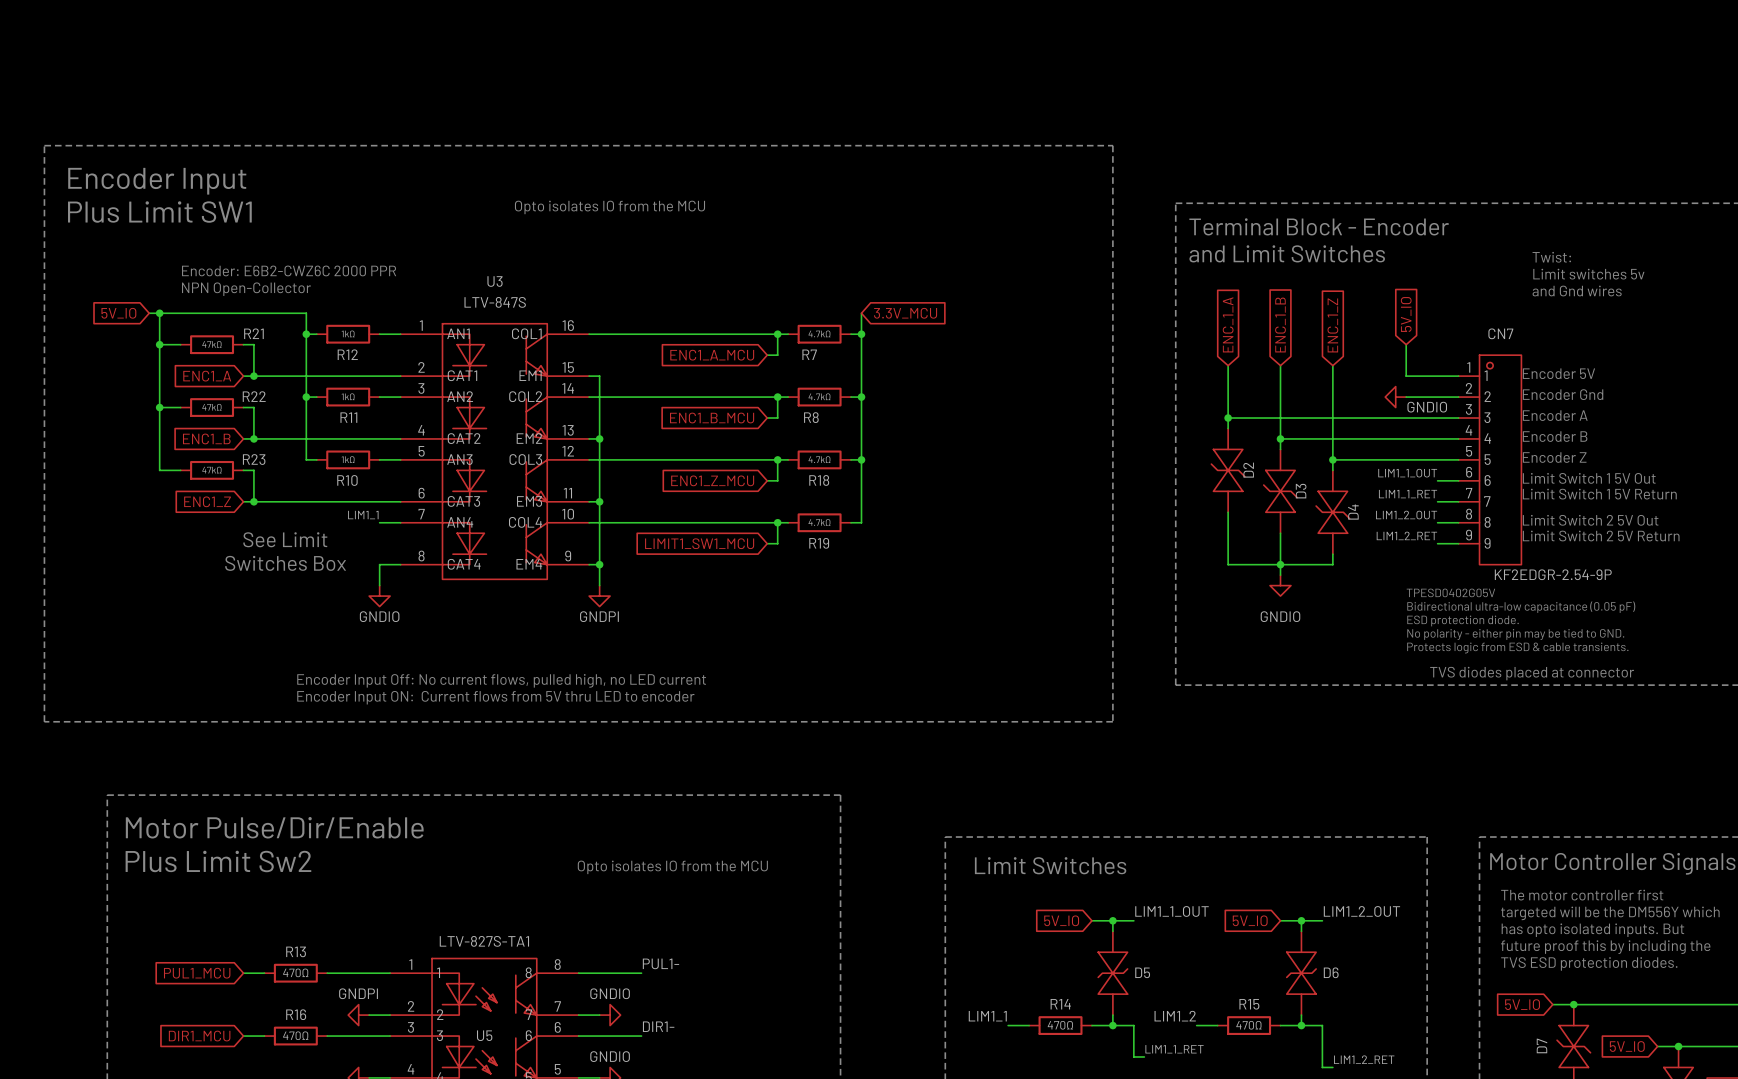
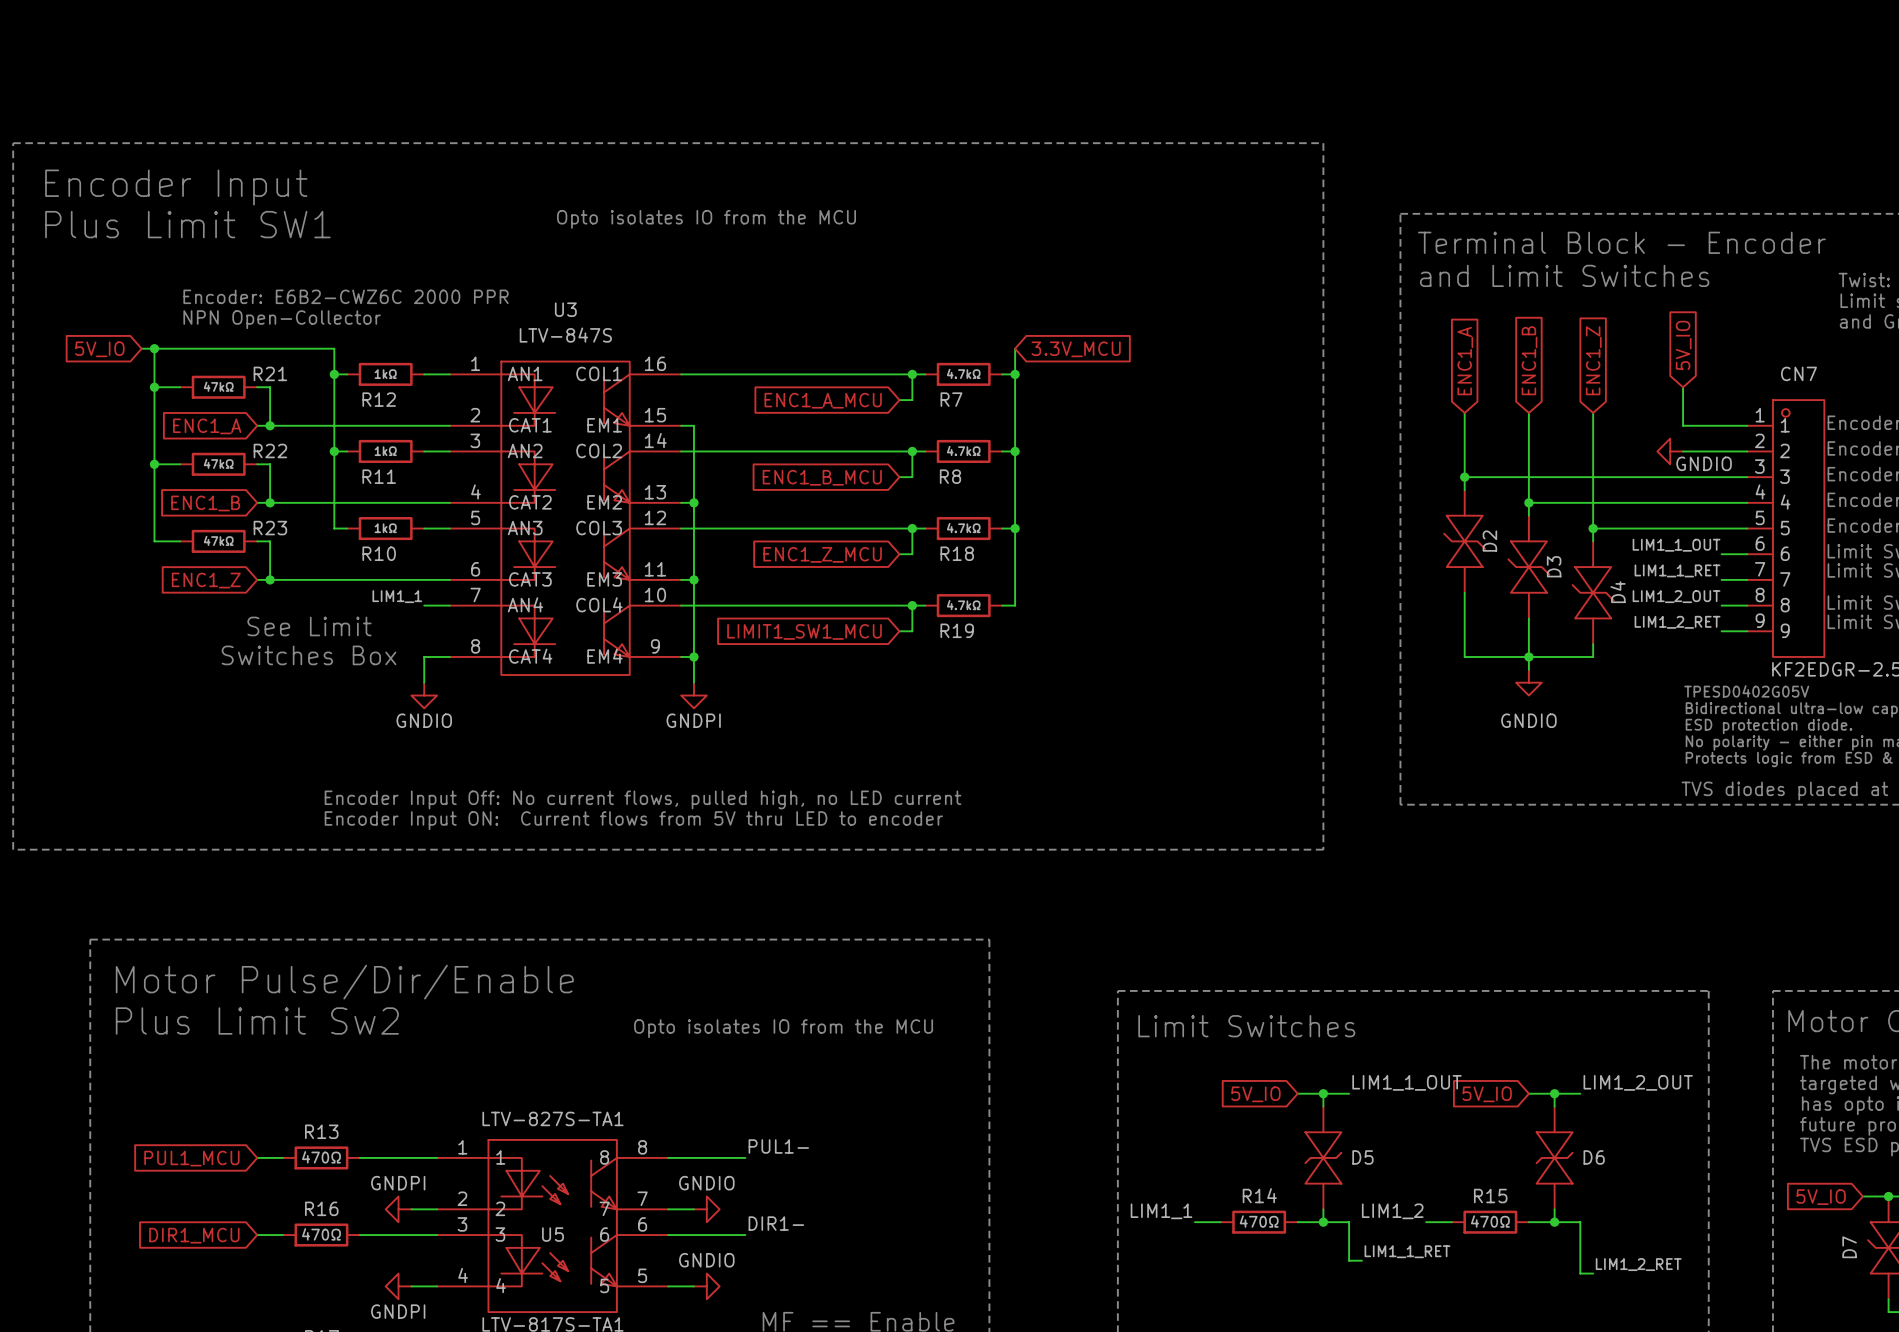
global label: ENC_1_A (1228, 324) -> ENC1_A (1465, 361)
global label: ENC_1_B (1280, 325) -> ENC1_B (1529, 360)
global label: ENC_1_Z (1332, 325) -> ENC1_Z (1593, 360)

